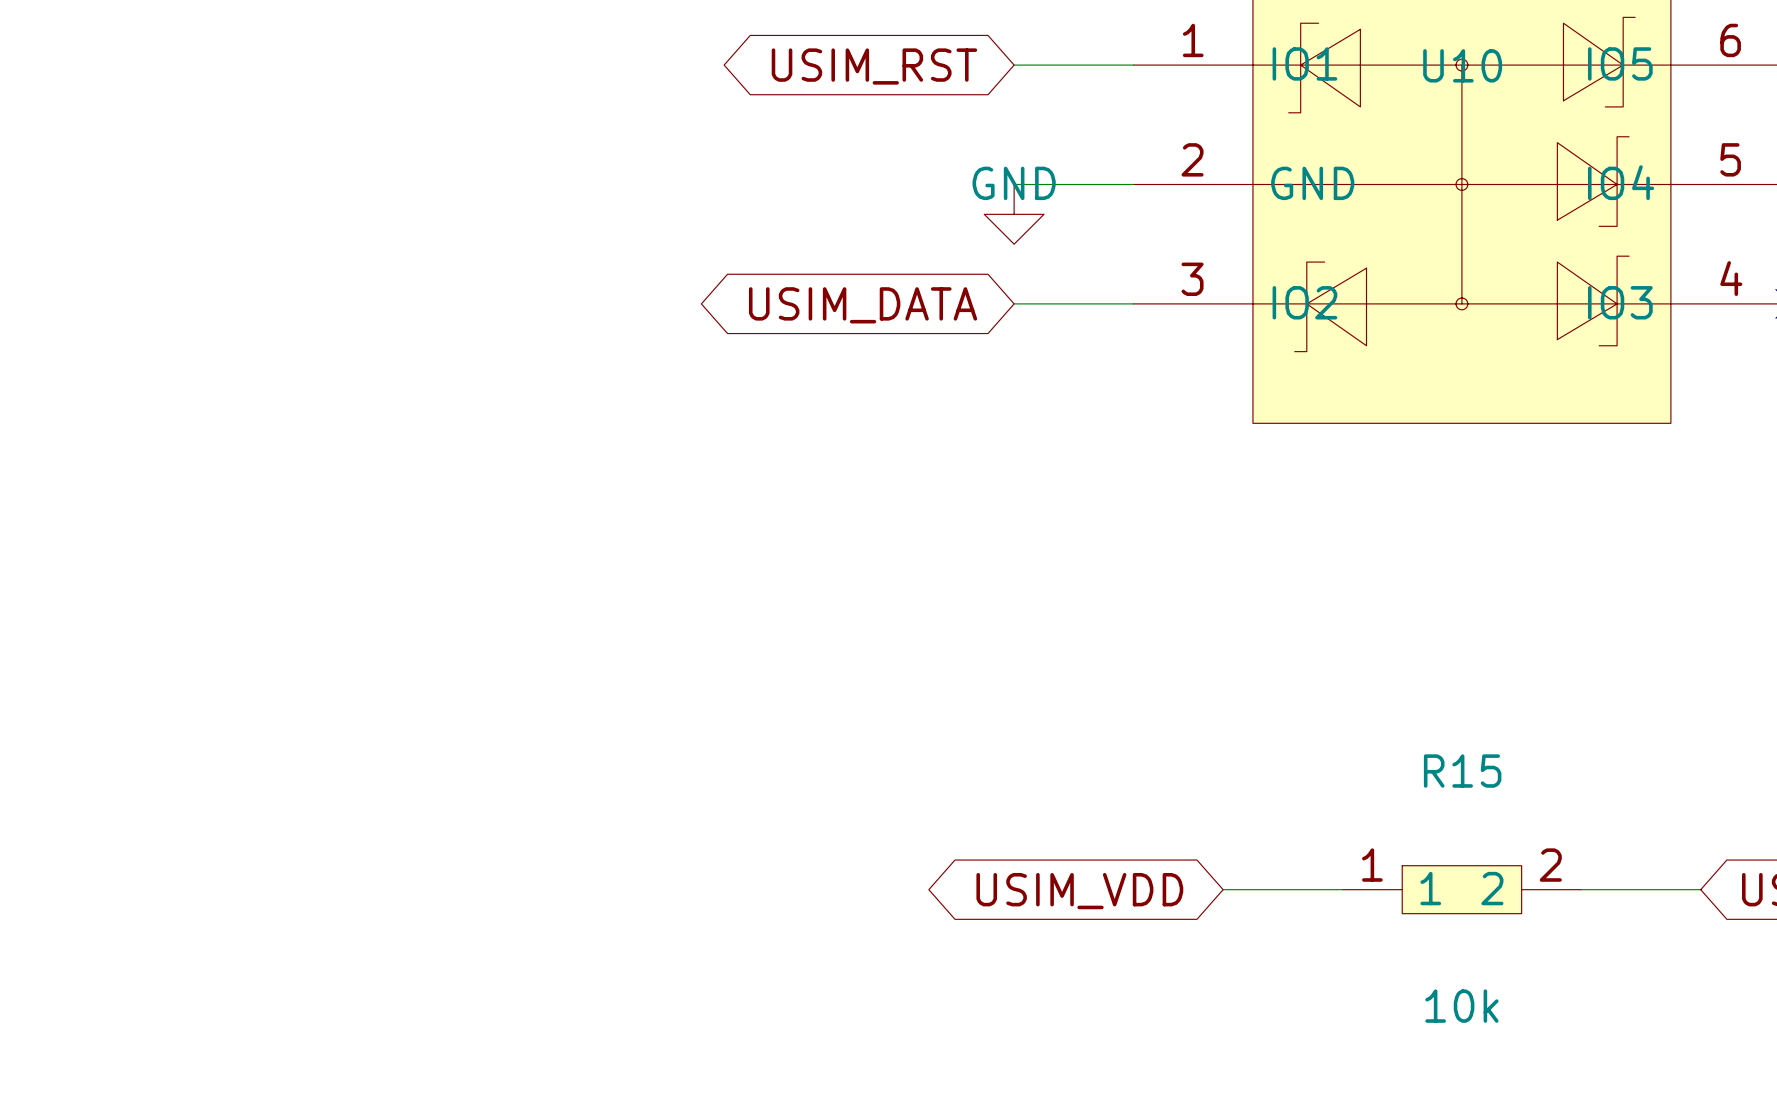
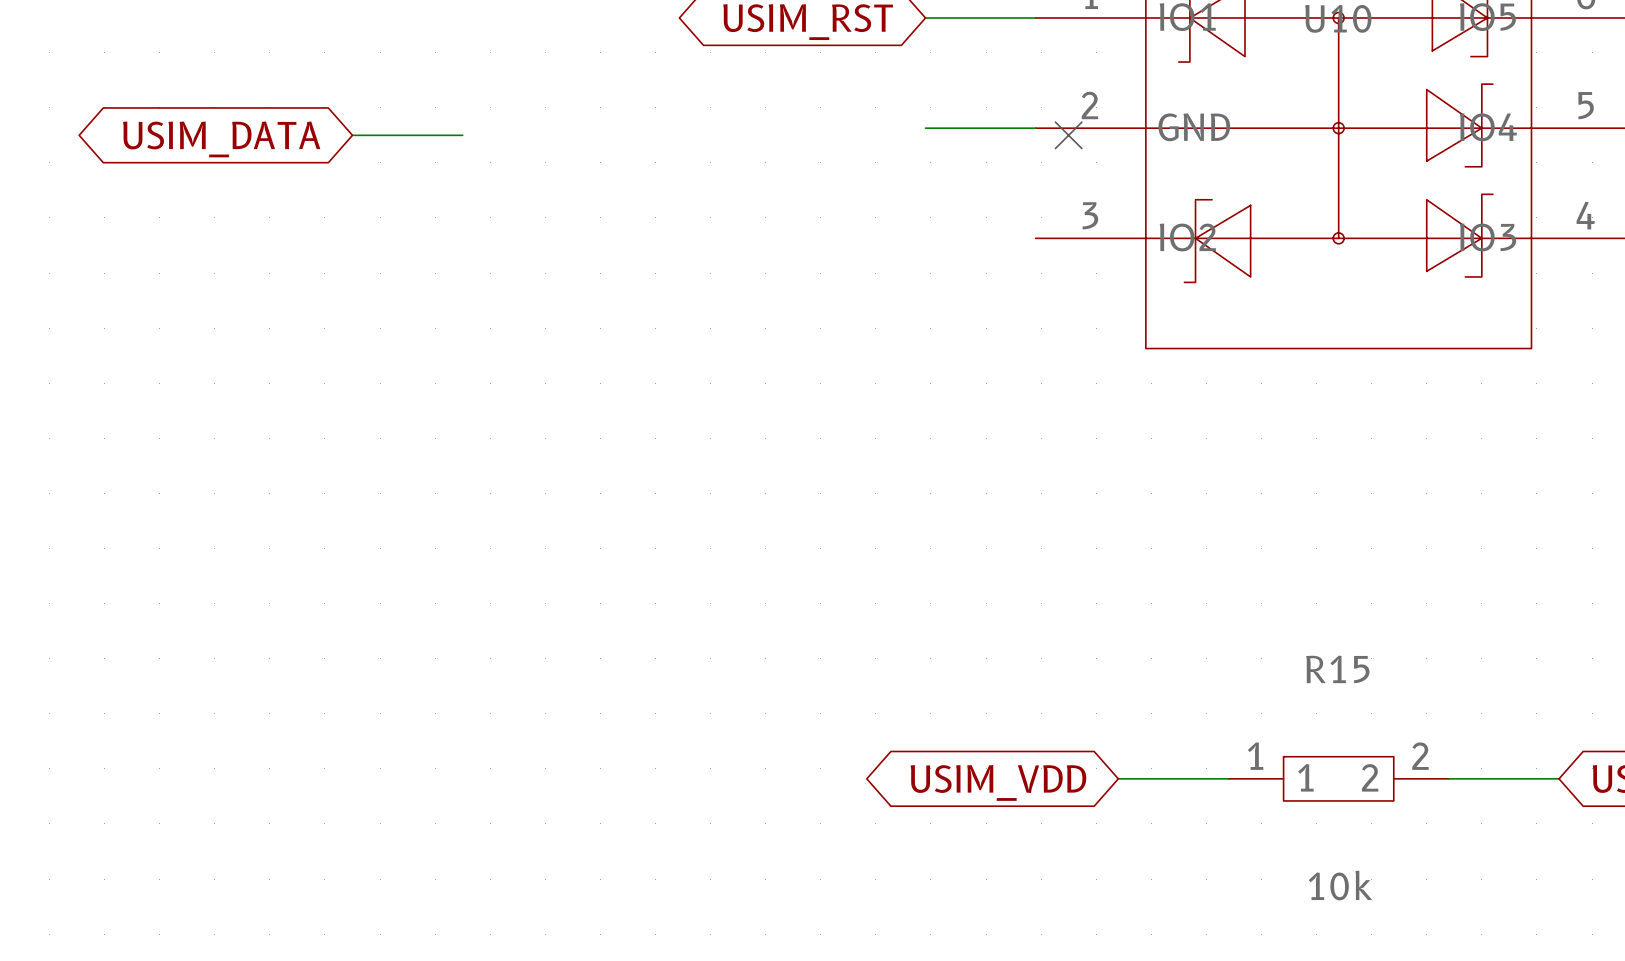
wire: none -> (352, 135) (462, 135)
no-connect mark: none -> (1068, 135)
global label: none -> USIM_DATA (221, 139)
power symbol: GND (1014, 214) -> none
wire: (1014, 303) (1133, 303) -> none
global label: USIM_DATA (863, 305) -> none

